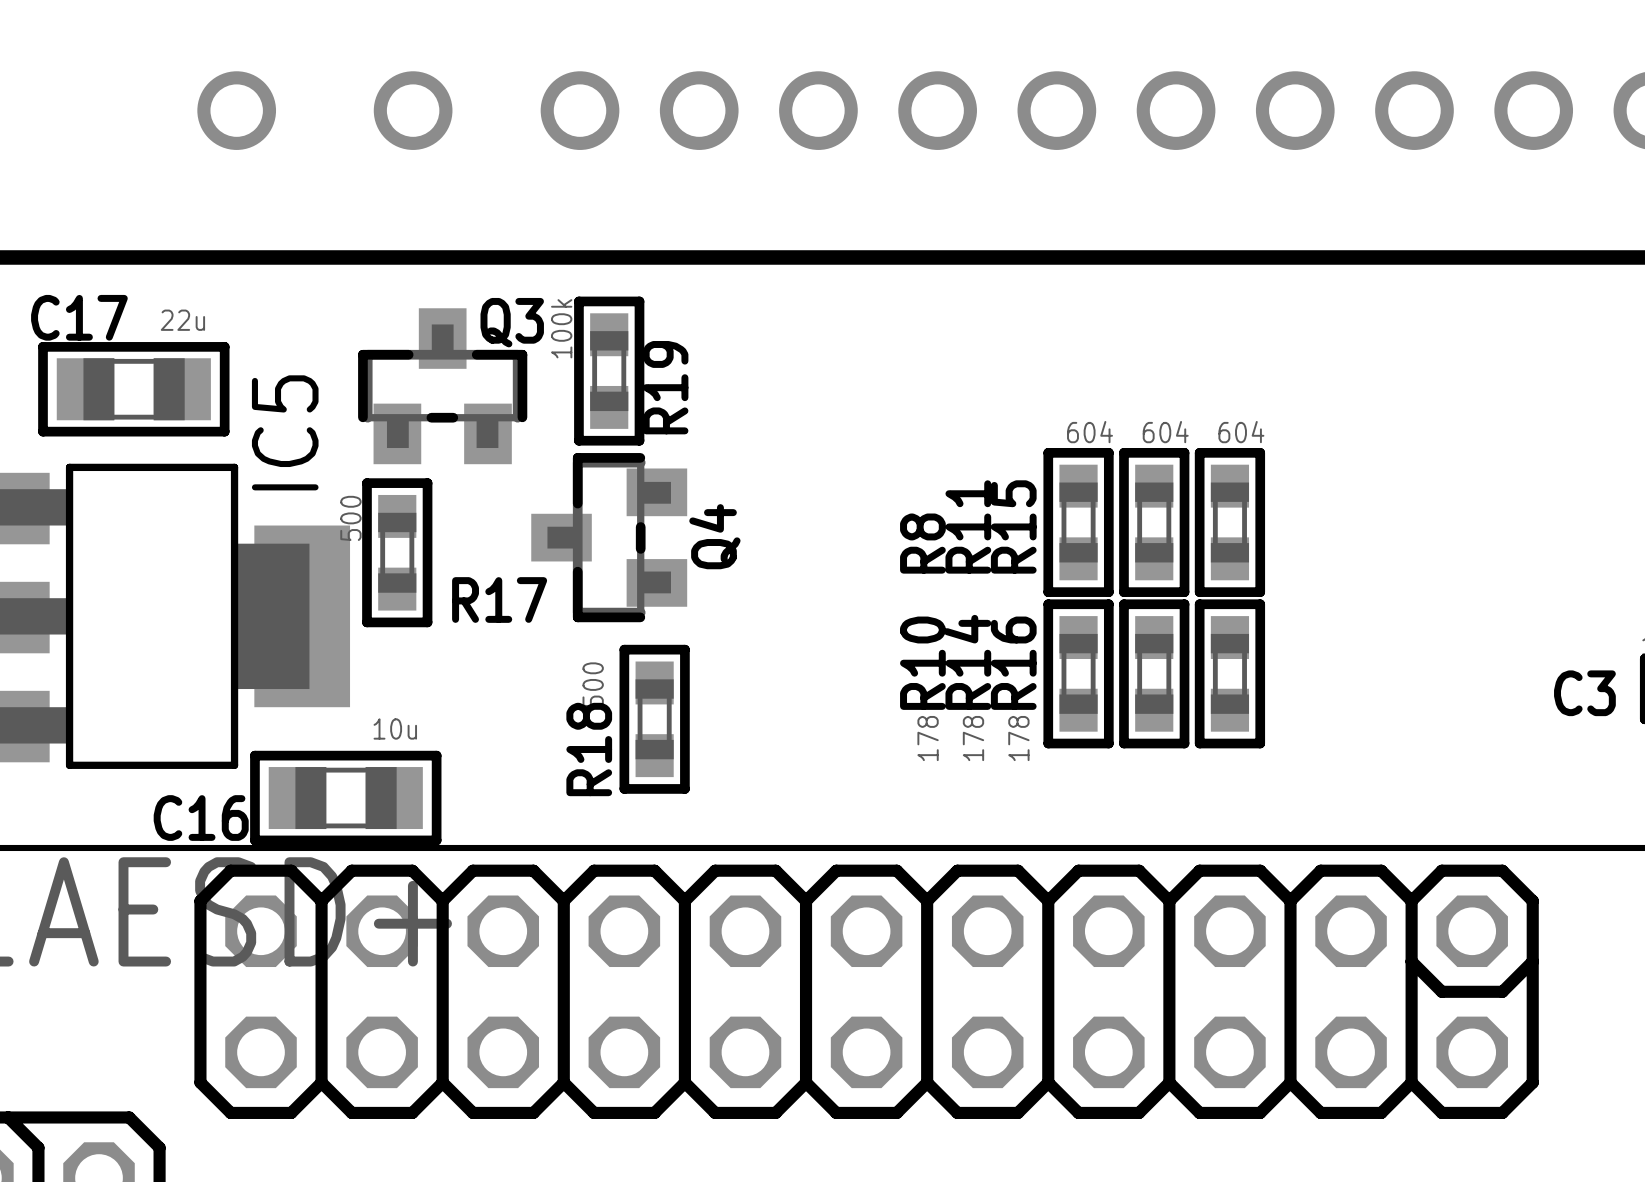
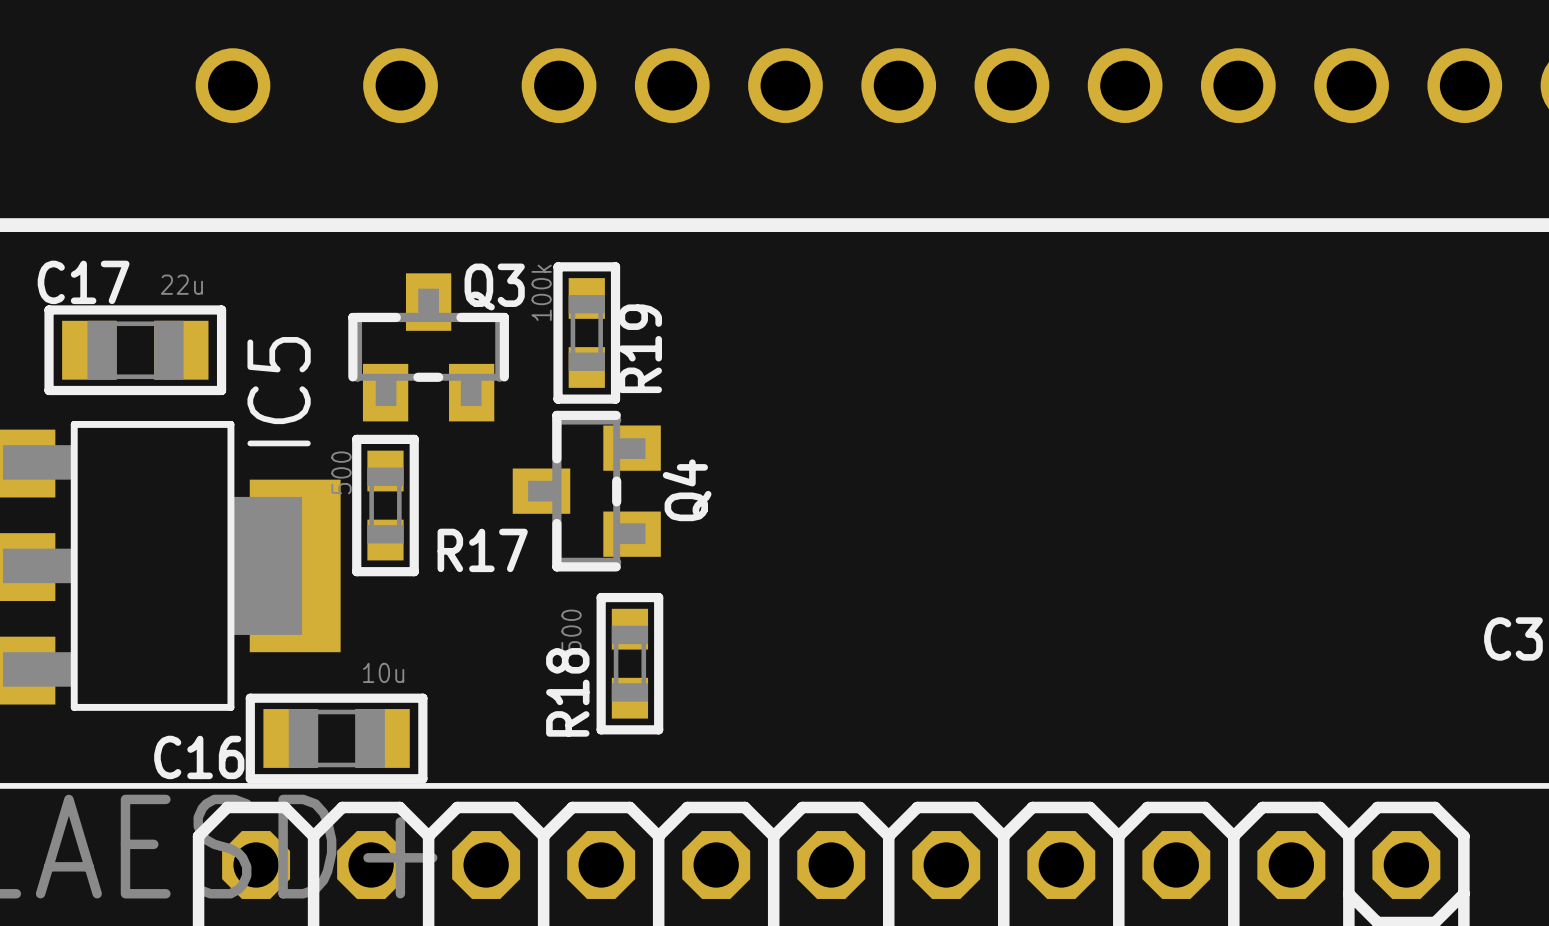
R8: 604 (1078, 522) -> none
R11: 604 (1154, 522) -> none
R15: 604 (1229, 522) -> none
R10: 178 (1078, 673) -> none
R14: 178 (1154, 673) -> none
R16: 178 (1229, 673) -> none

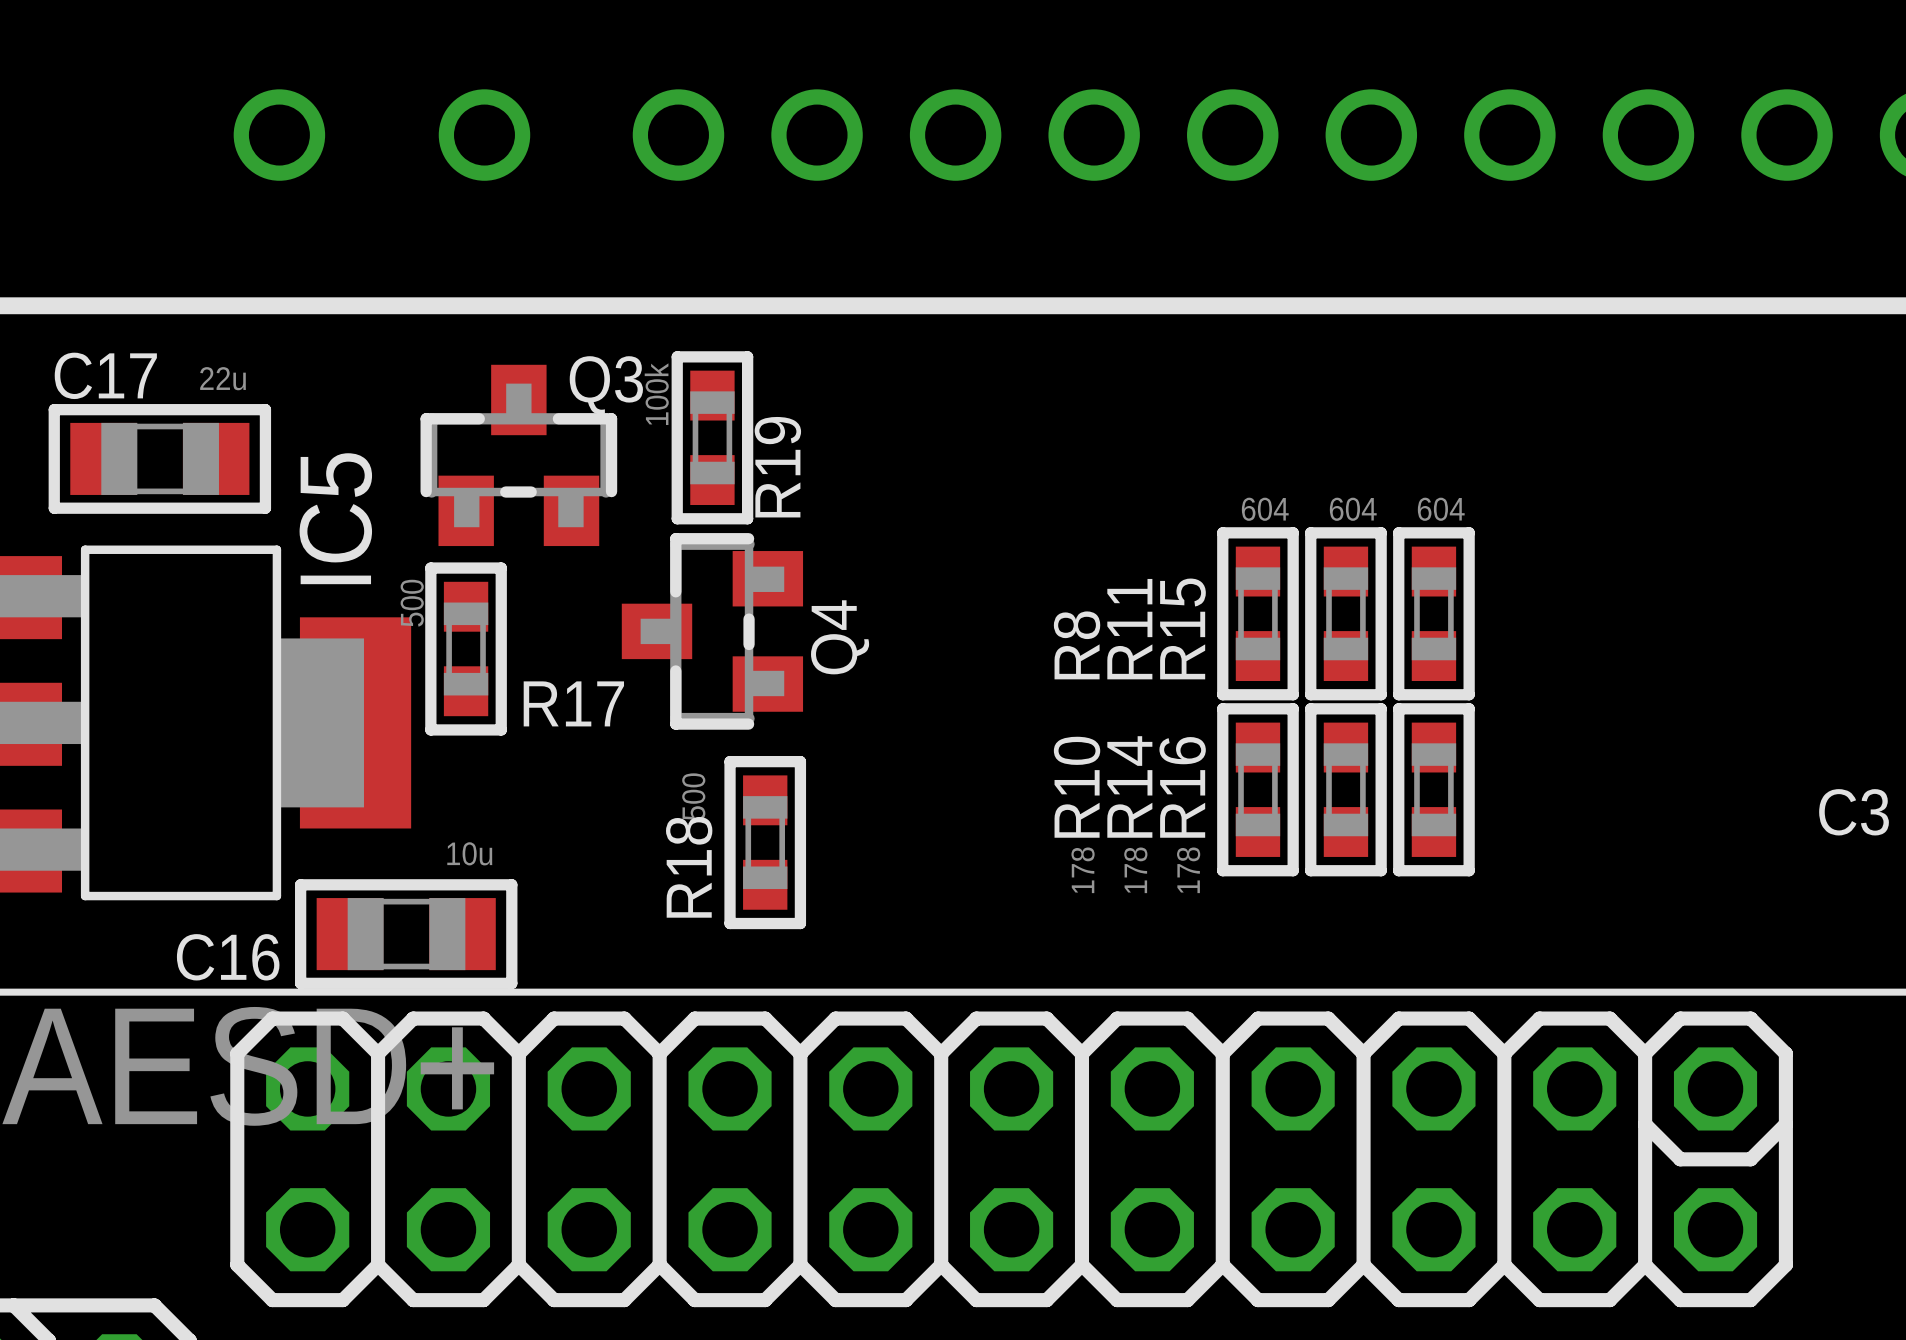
R8: none -> 604 (1257, 613)
R11: none -> 604 (1345, 613)
R15: none -> 604 (1433, 613)
R10: none -> 178 (1257, 789)
R14: none -> 178 (1345, 789)
R16: none -> 178 (1433, 789)

